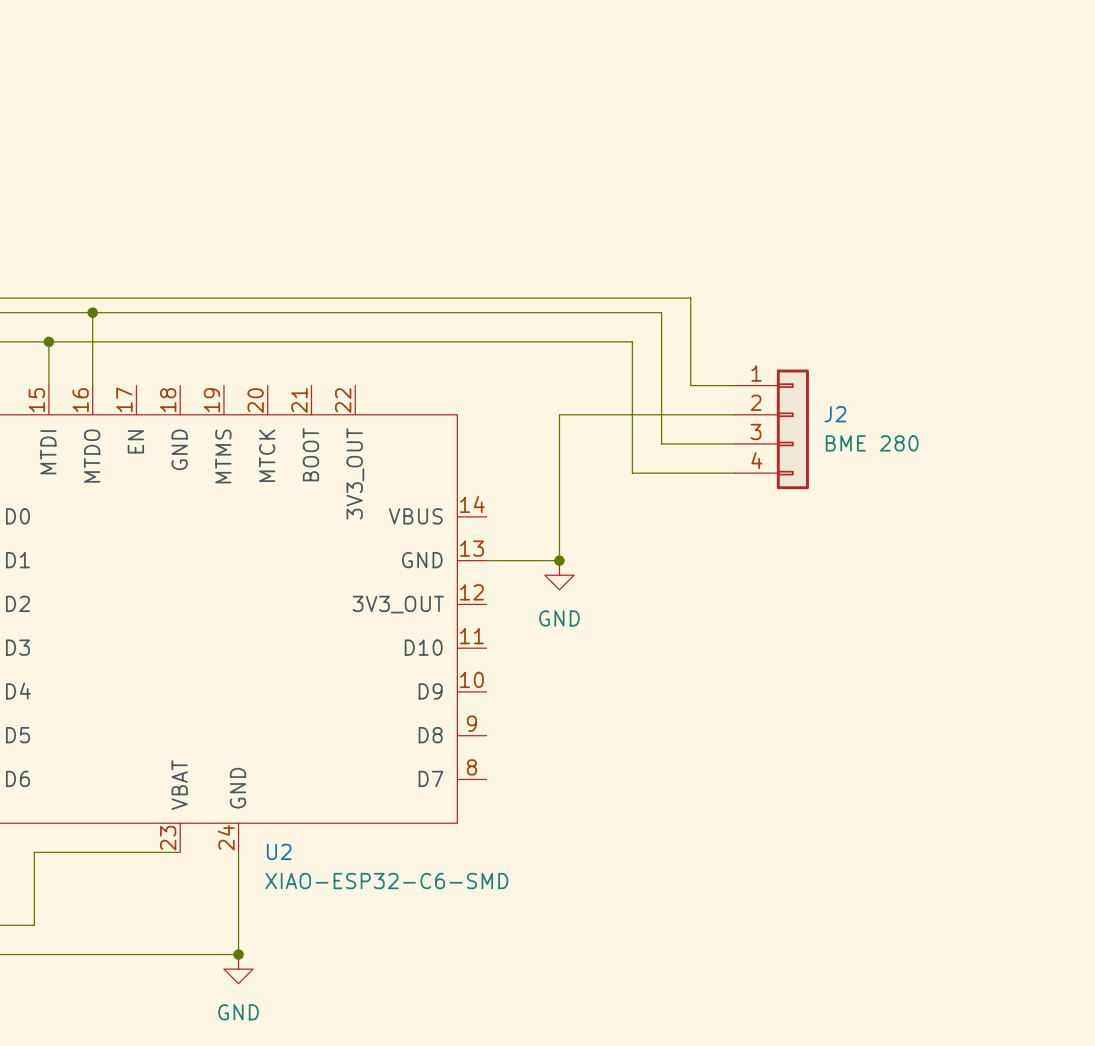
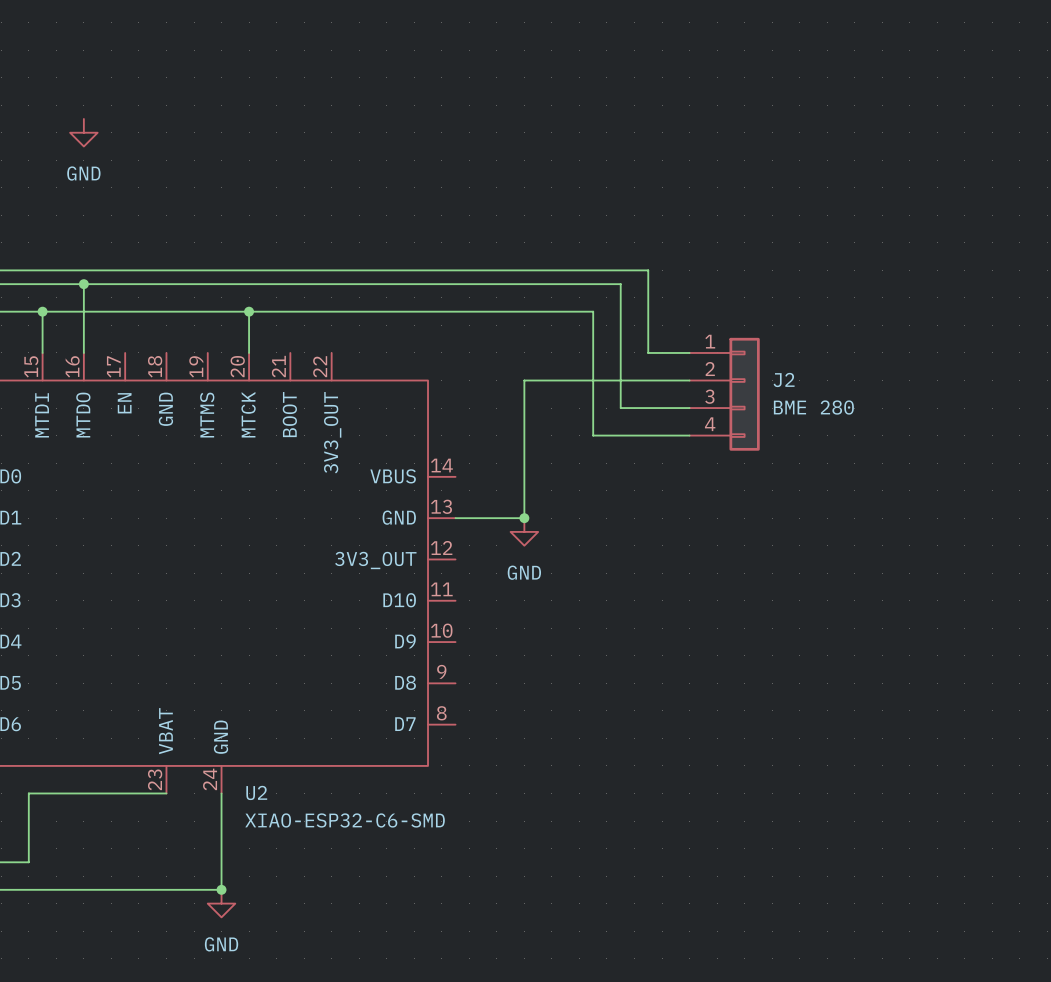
power symbol: none -> GND (83, 132)
wire: none -> (249, 311) (249, 352)
junction: none -> (249, 311)

